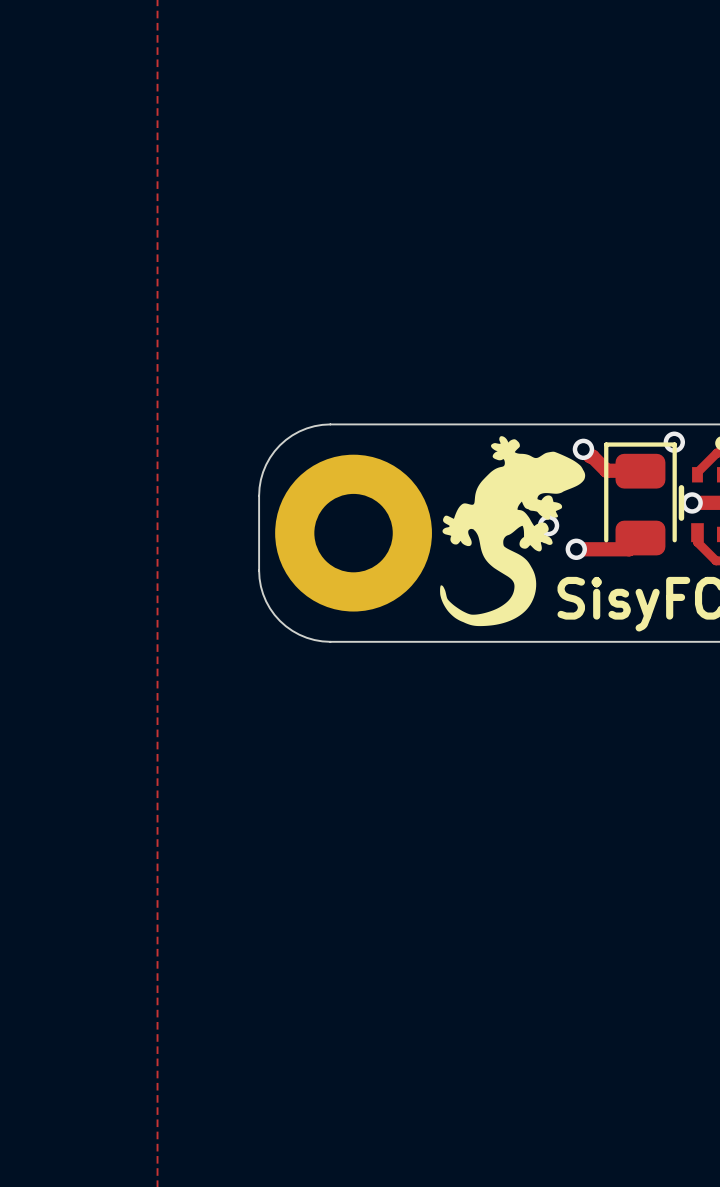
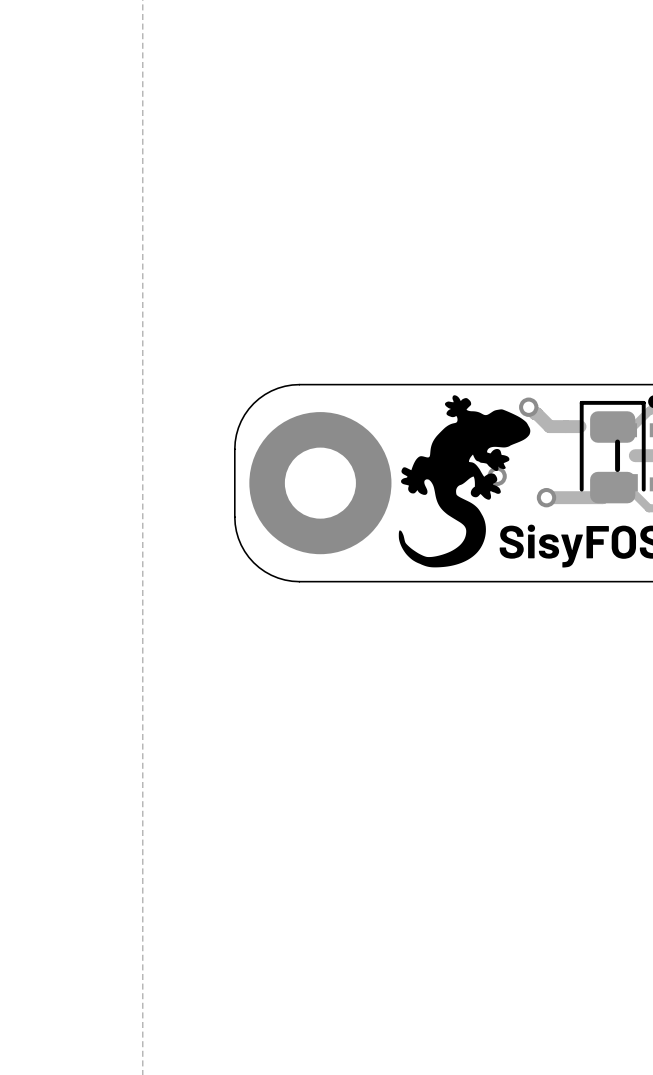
via: (674, 442) -> none
part position: (640, 498) -> (612, 452)
via: (692, 502) -> none
via position: (576, 549) -> (546, 497)

